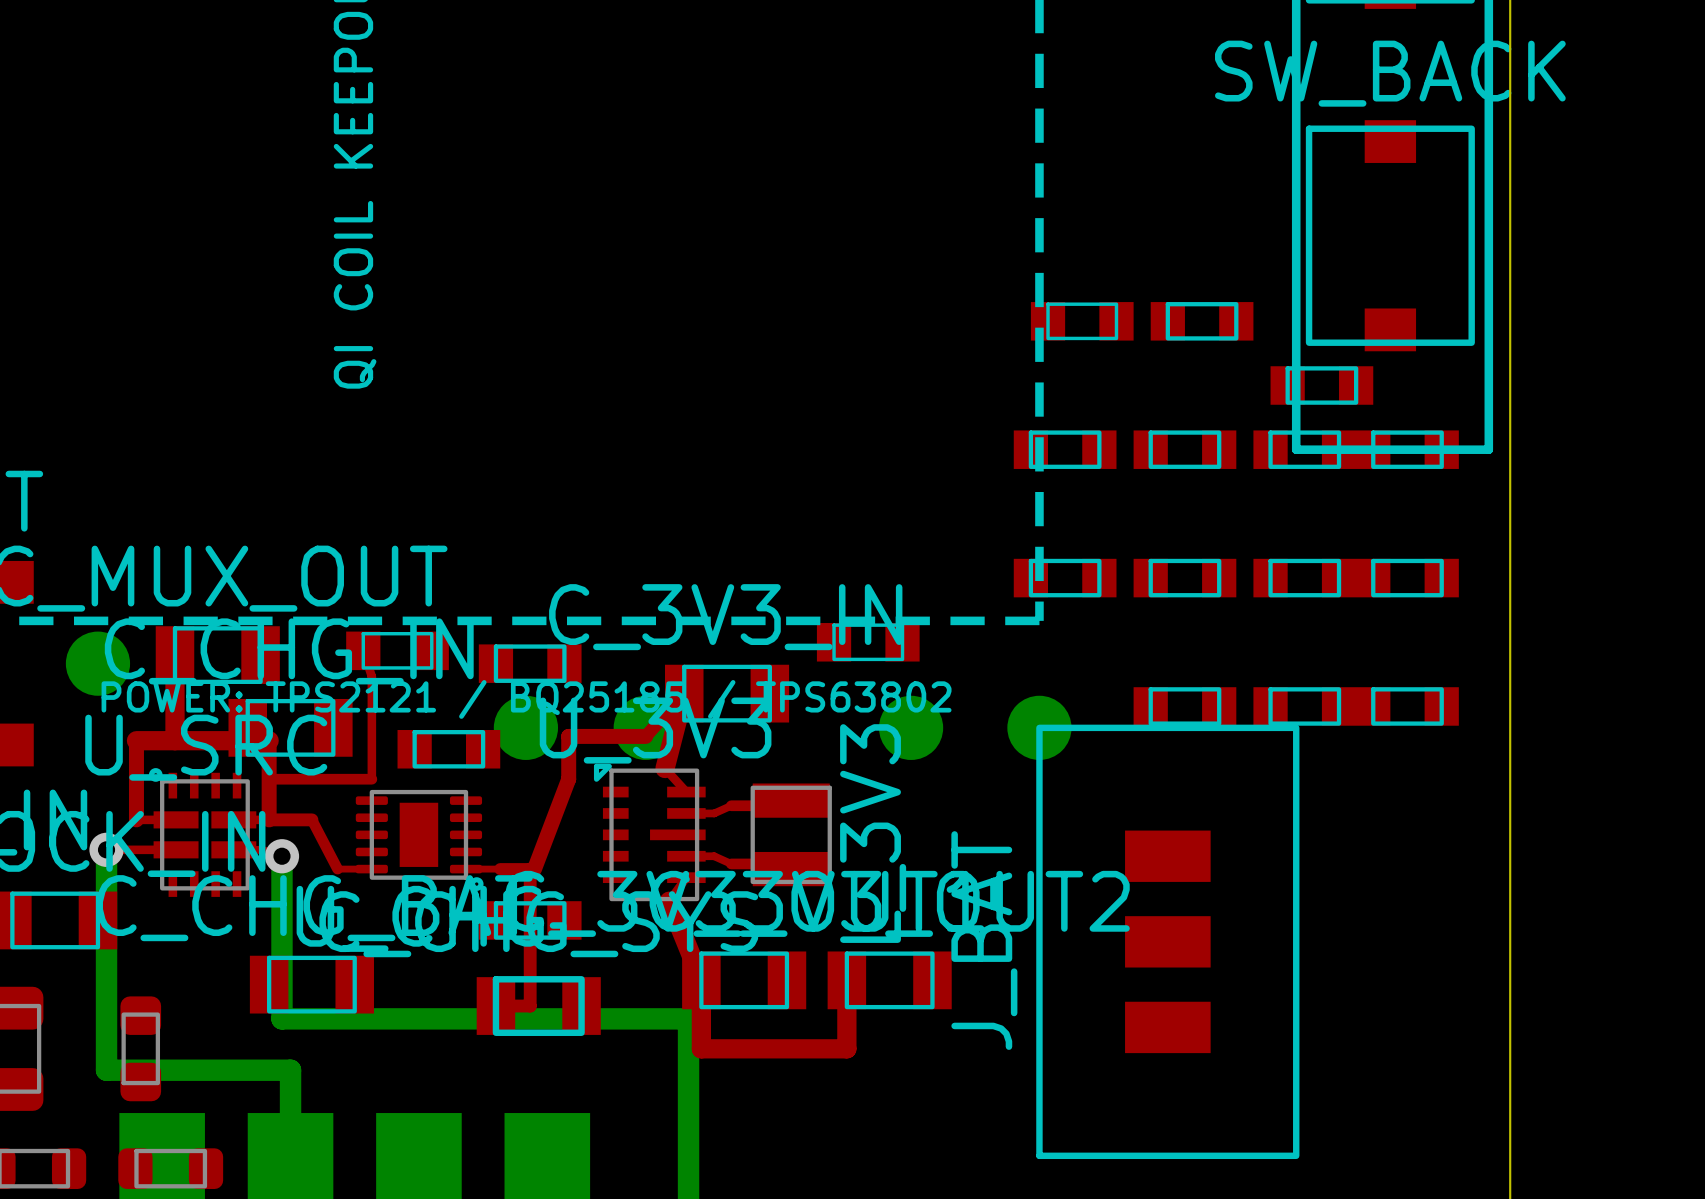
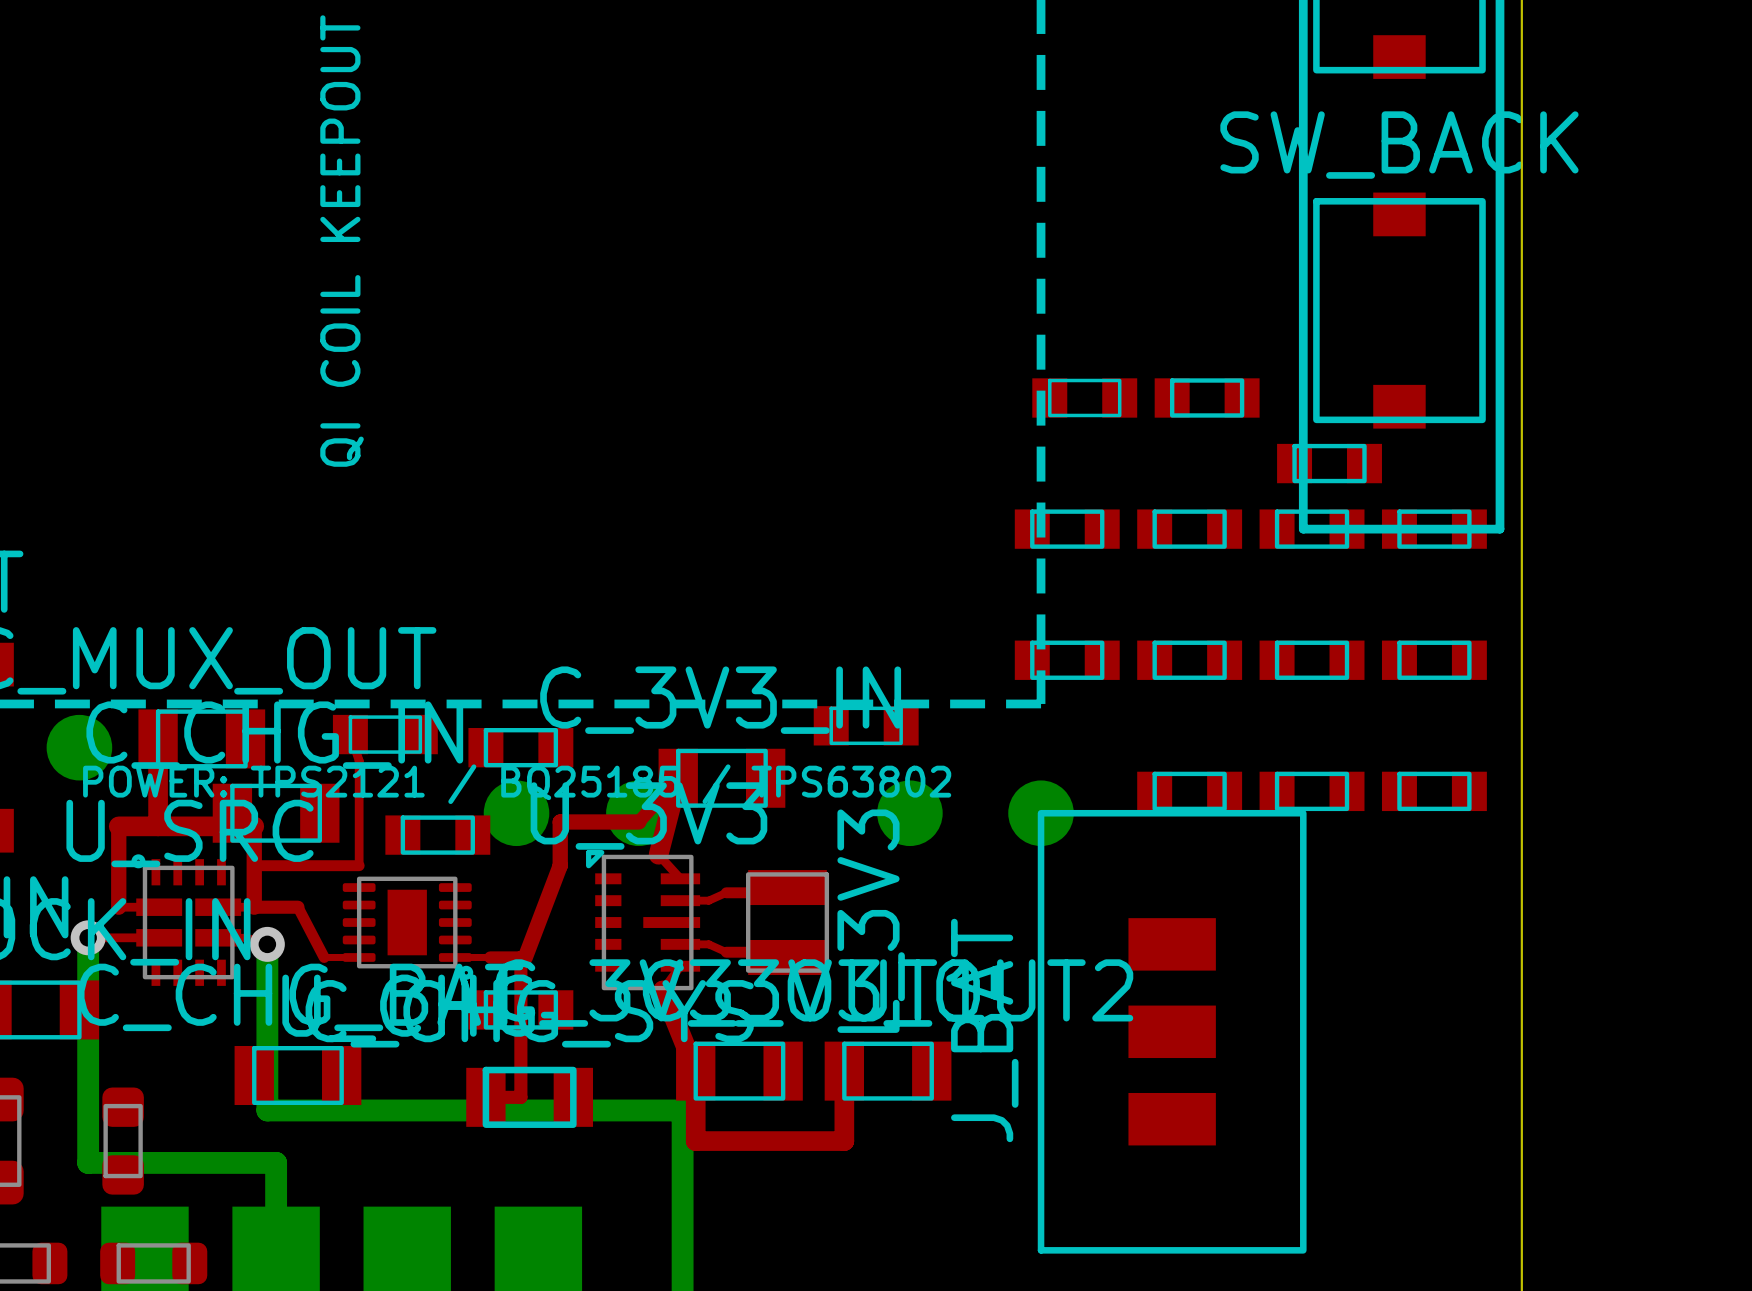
part position: (1407, 449) -> (1434, 529)
part position: (1407, 578) -> (1434, 660)
part position: (1407, 706) -> (1434, 791)

